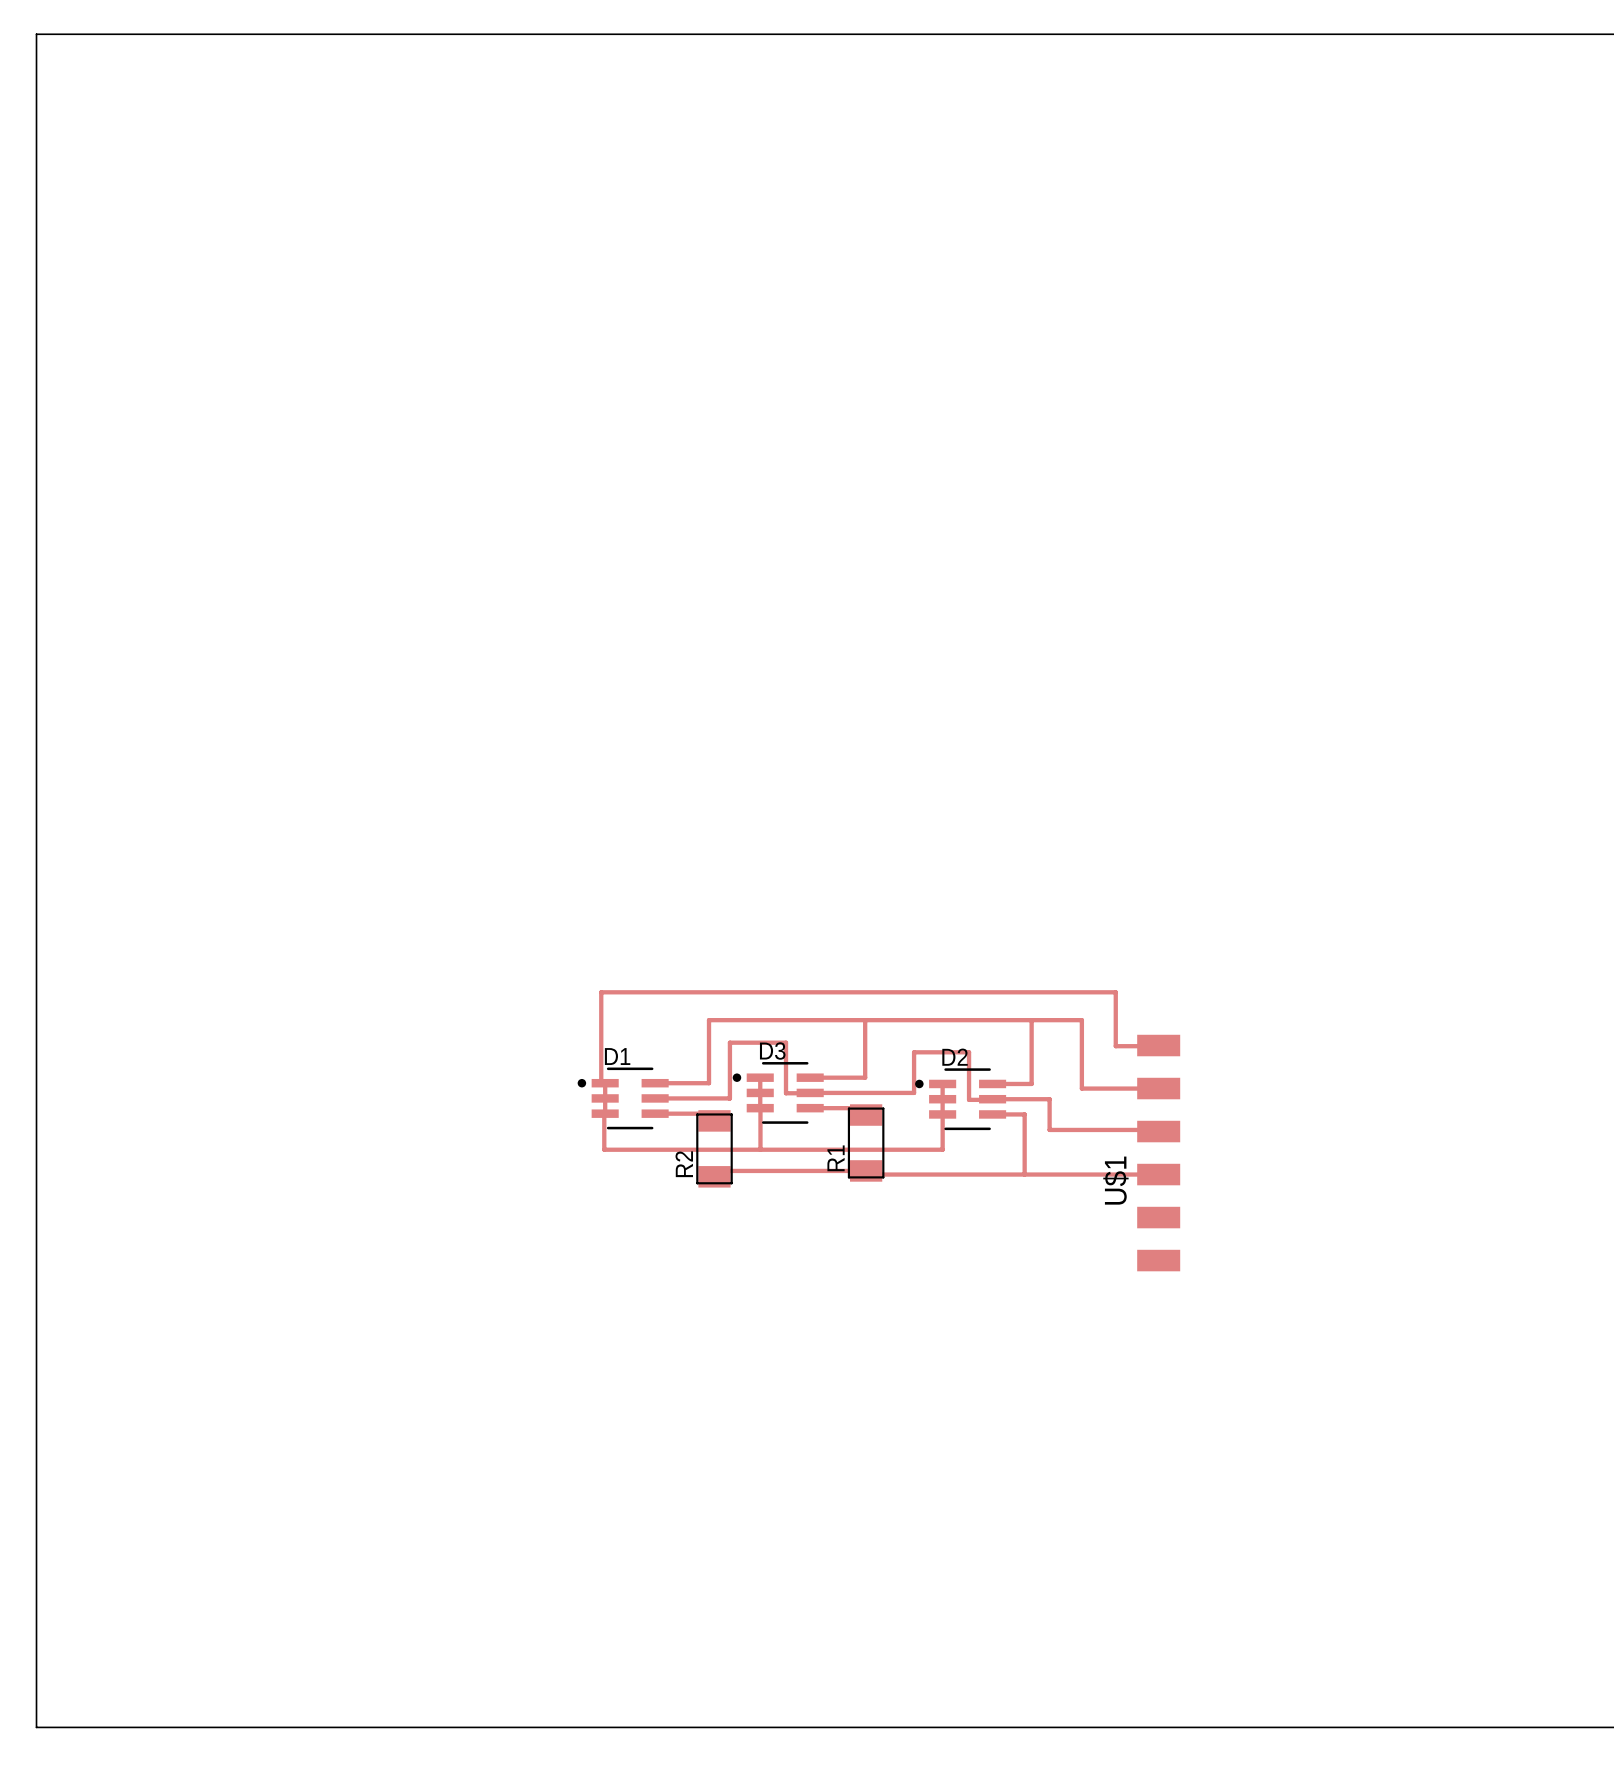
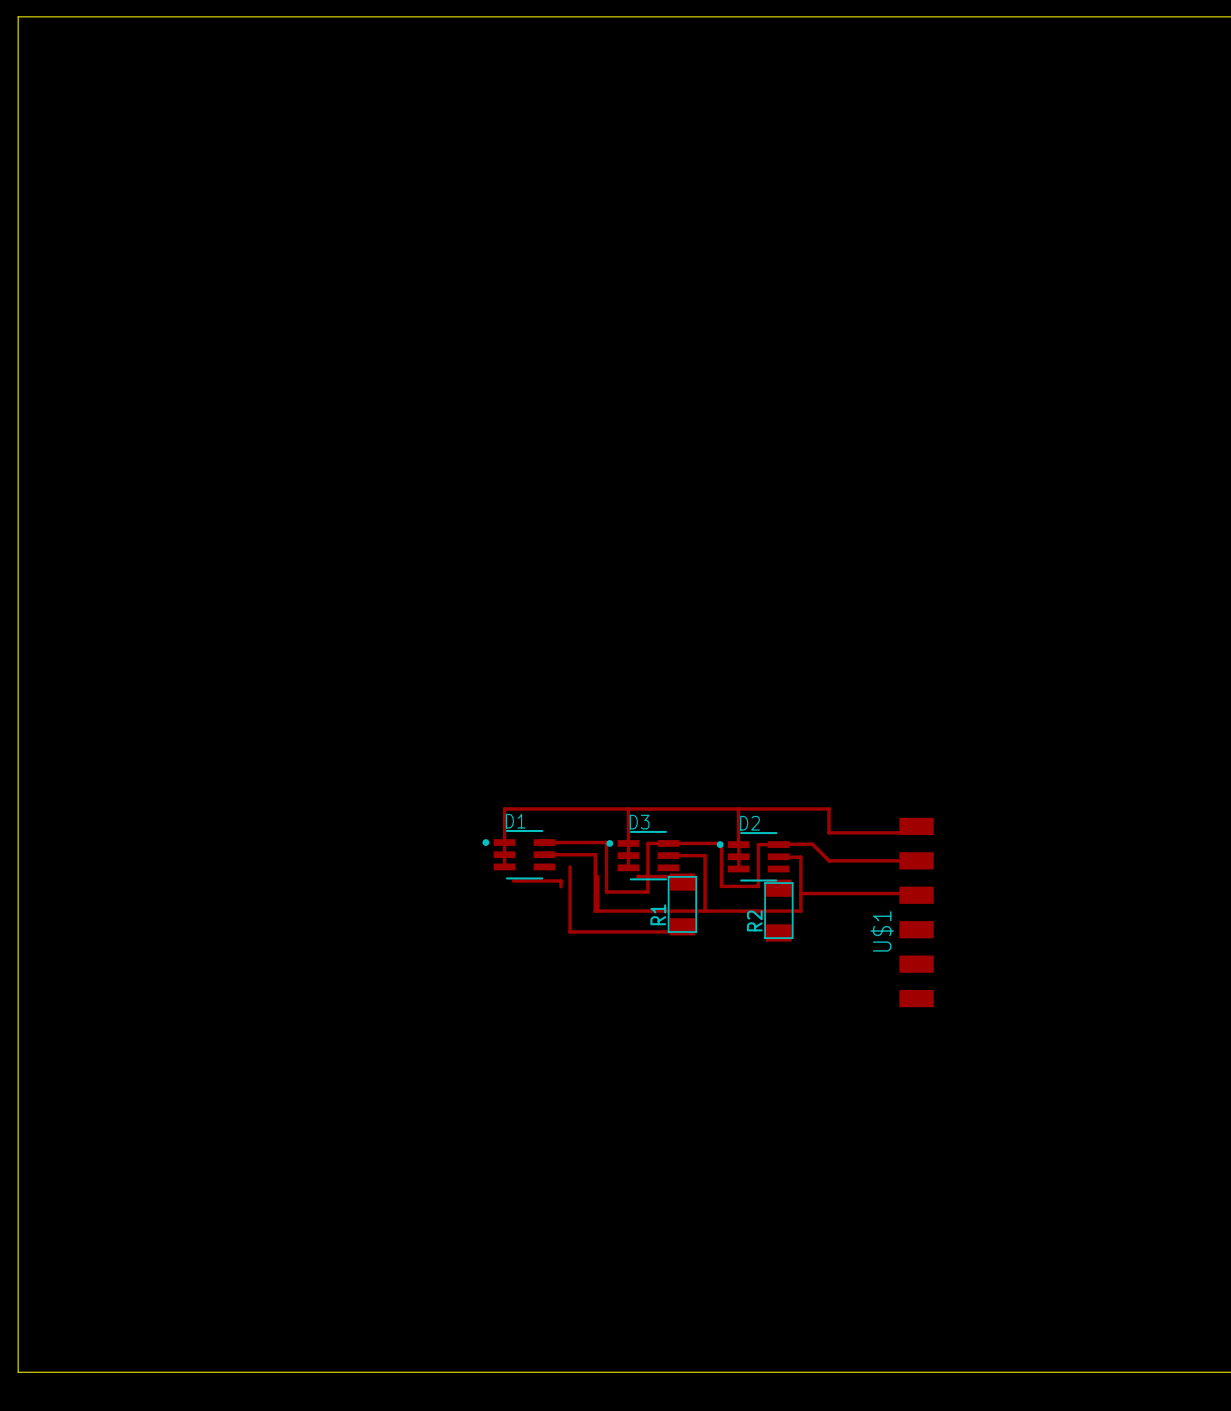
top track: (865, 1020) (865, 1077) (810, 1077) -> none
top track: (1031, 1020) (1031, 1083) (1014, 1083) -> (544, 854) (595, 854) (595, 911) (800, 911) (800, 857)
top track: none -> (628, 808) (628, 867)
top track: none -> (738, 808) (738, 868)
top track: (1158, 1045) (1115, 1046) (1115, 992) (601, 992) (601, 1083) (605, 1083) (604, 1149) (942, 1149) (942, 1083) -> none
top track: none -> (916, 832) (828, 832) (828, 808) (504, 808) (504, 842)
top track: (760, 1077) (760, 1108) -> (504, 842) (504, 866)
top track: none -> (668, 855) (705, 855) (705, 911)
top track: (655, 1083) (709, 1083) (709, 1020) (1081, 1020) (1081, 1088) -> (544, 842) (606, 842) (606, 891) (647, 891) (647, 843) (721, 843) (721, 886) (758, 886) (758, 844) (812, 844) (829, 860) (855, 860)
D3 position: (778, 1092) -> (642, 855)
top track: (803, 1092) (914, 1092) (914, 1052) (969, 1052) (969, 1099) (1049, 1099) (1049, 1129) (1149, 1129) -> none
top track: (810, 1092) (786, 1093) (786, 1042) (729, 1042) (729, 1098) (655, 1098) -> none
top track: none -> (570, 866) (570, 931) (684, 931)
D1 position: (623, 1098) -> (518, 854)
D2 position: (960, 1099) -> (753, 856)
top track: (992, 1114) (1024, 1114) (1024, 1174) -> none
top track: none -> (800, 893) (914, 893)
R2 position: (714, 1148) -> (778, 910)
top track: (720, 1170) (714, 1176) (714, 1170) (866, 1170) (866, 1174) (1158, 1174) -> none

